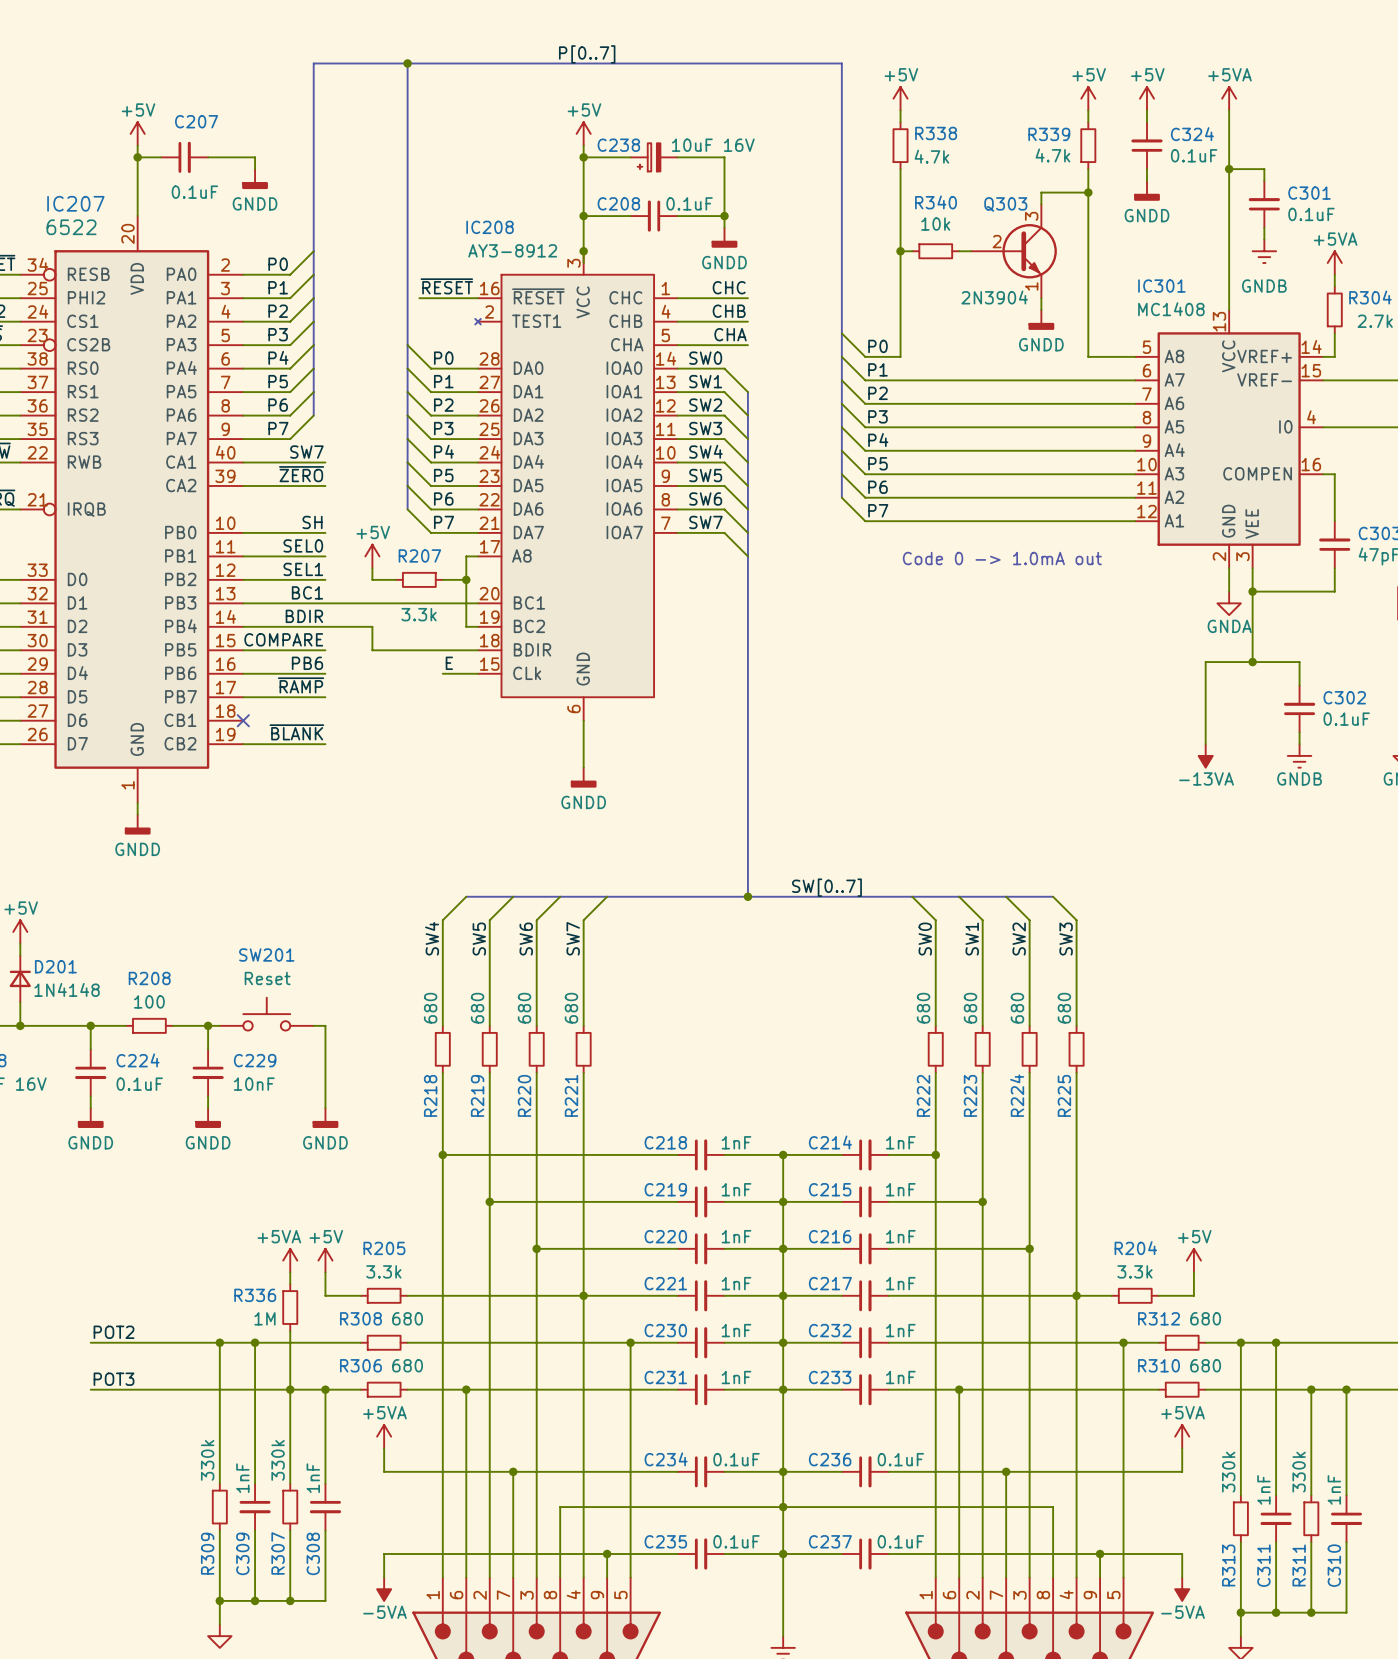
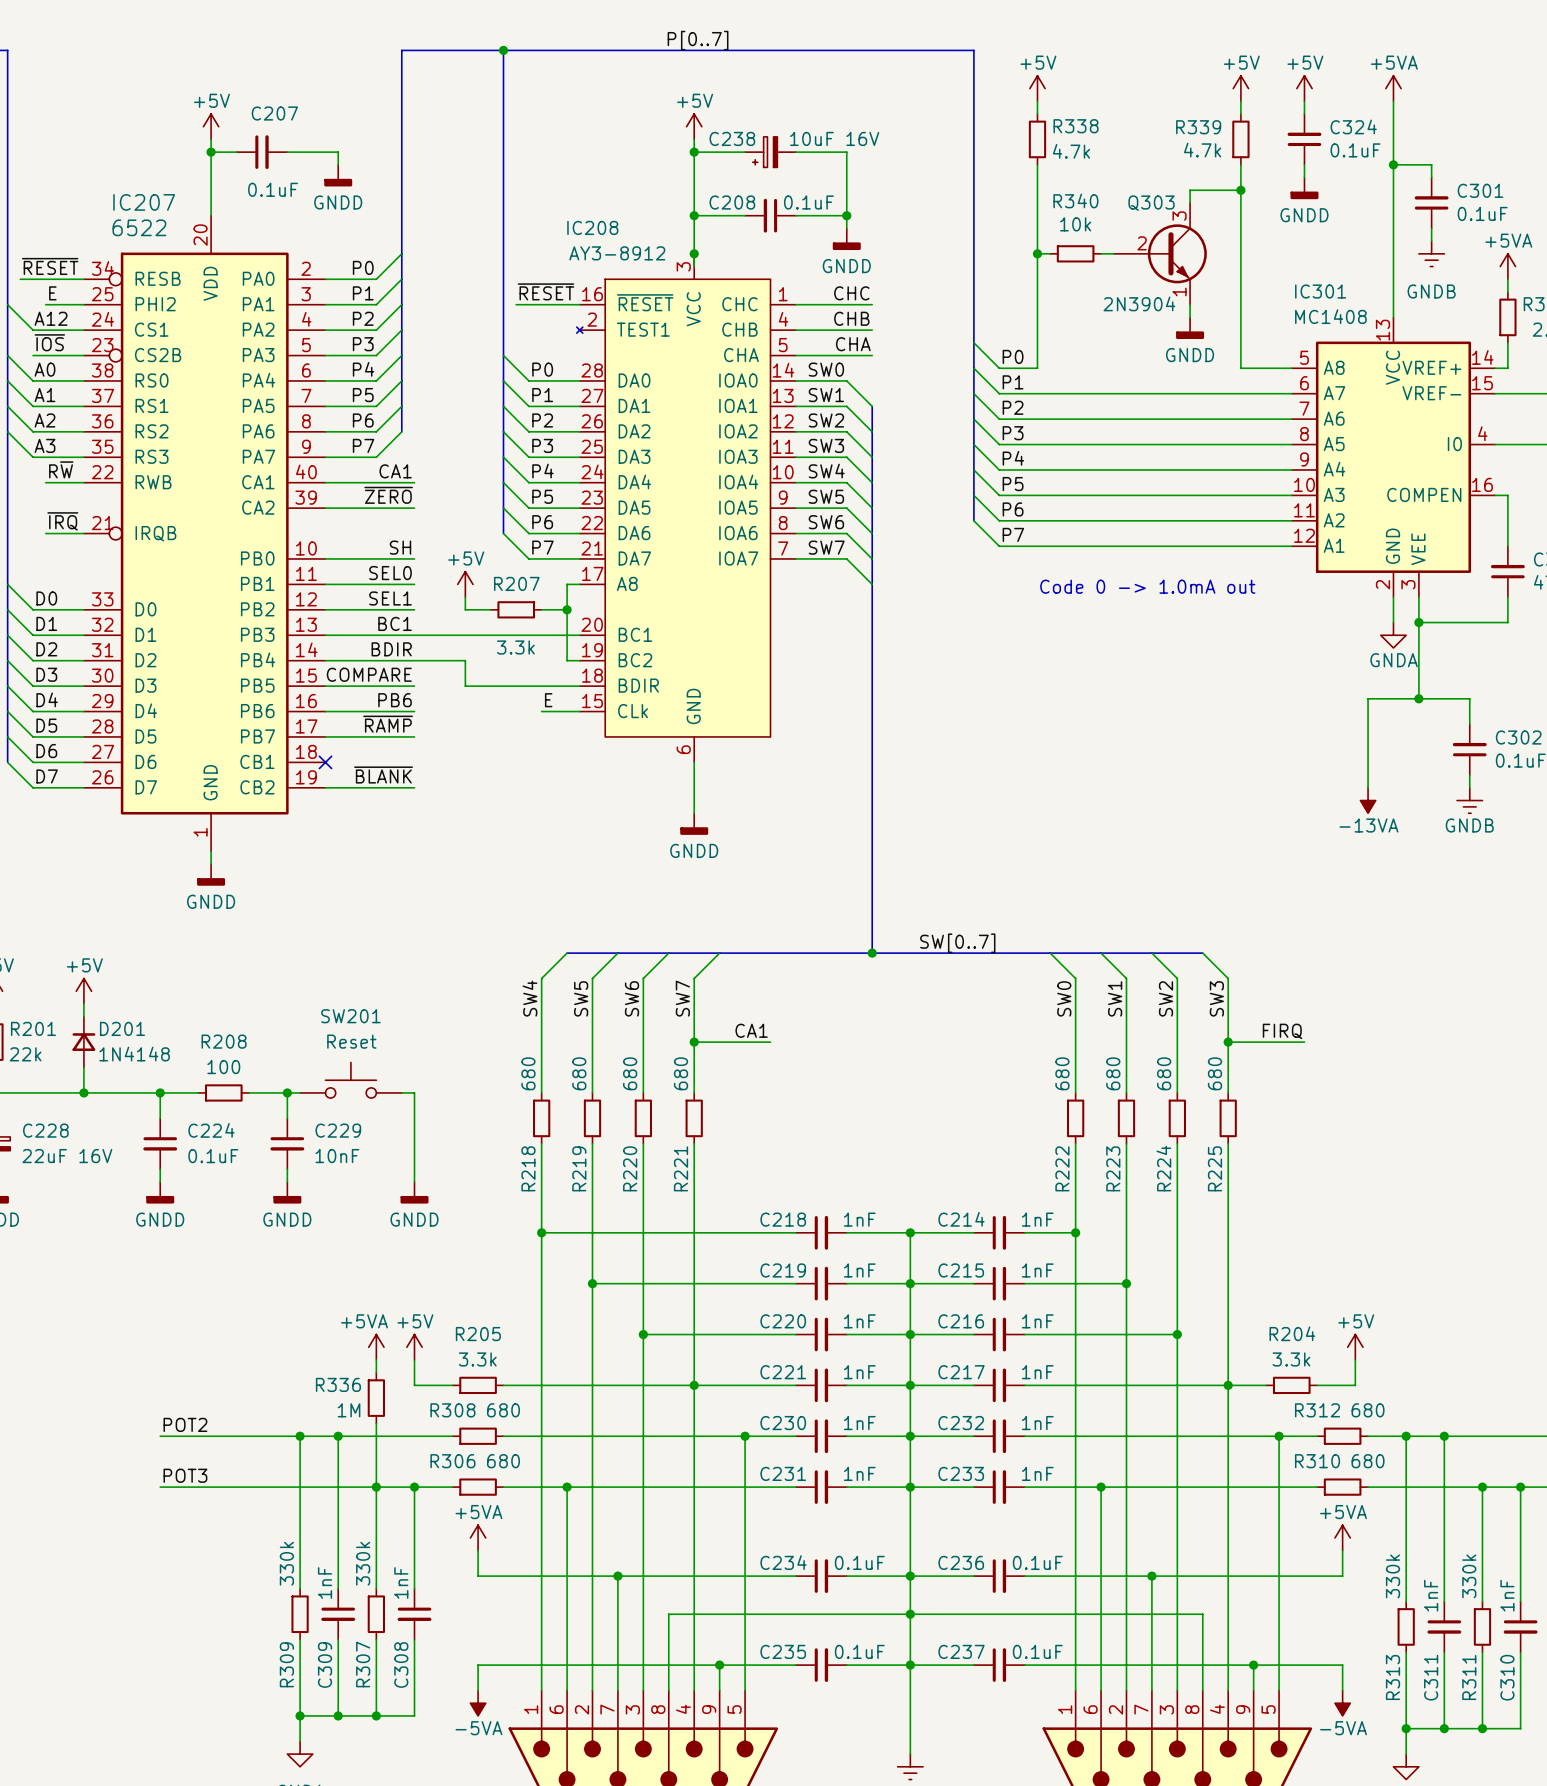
label: SW7 (306, 452) -> CA1 (395, 471)
label: none -> CA1 (751, 1030)
label: none -> FIRQ (1282, 1031)
wire: none -> (694, 1042) (770, 1042)
junction: none -> (694, 1042)
wire: none -> (1228, 1042) (1304, 1042)
junction: none -> (1228, 1042)

